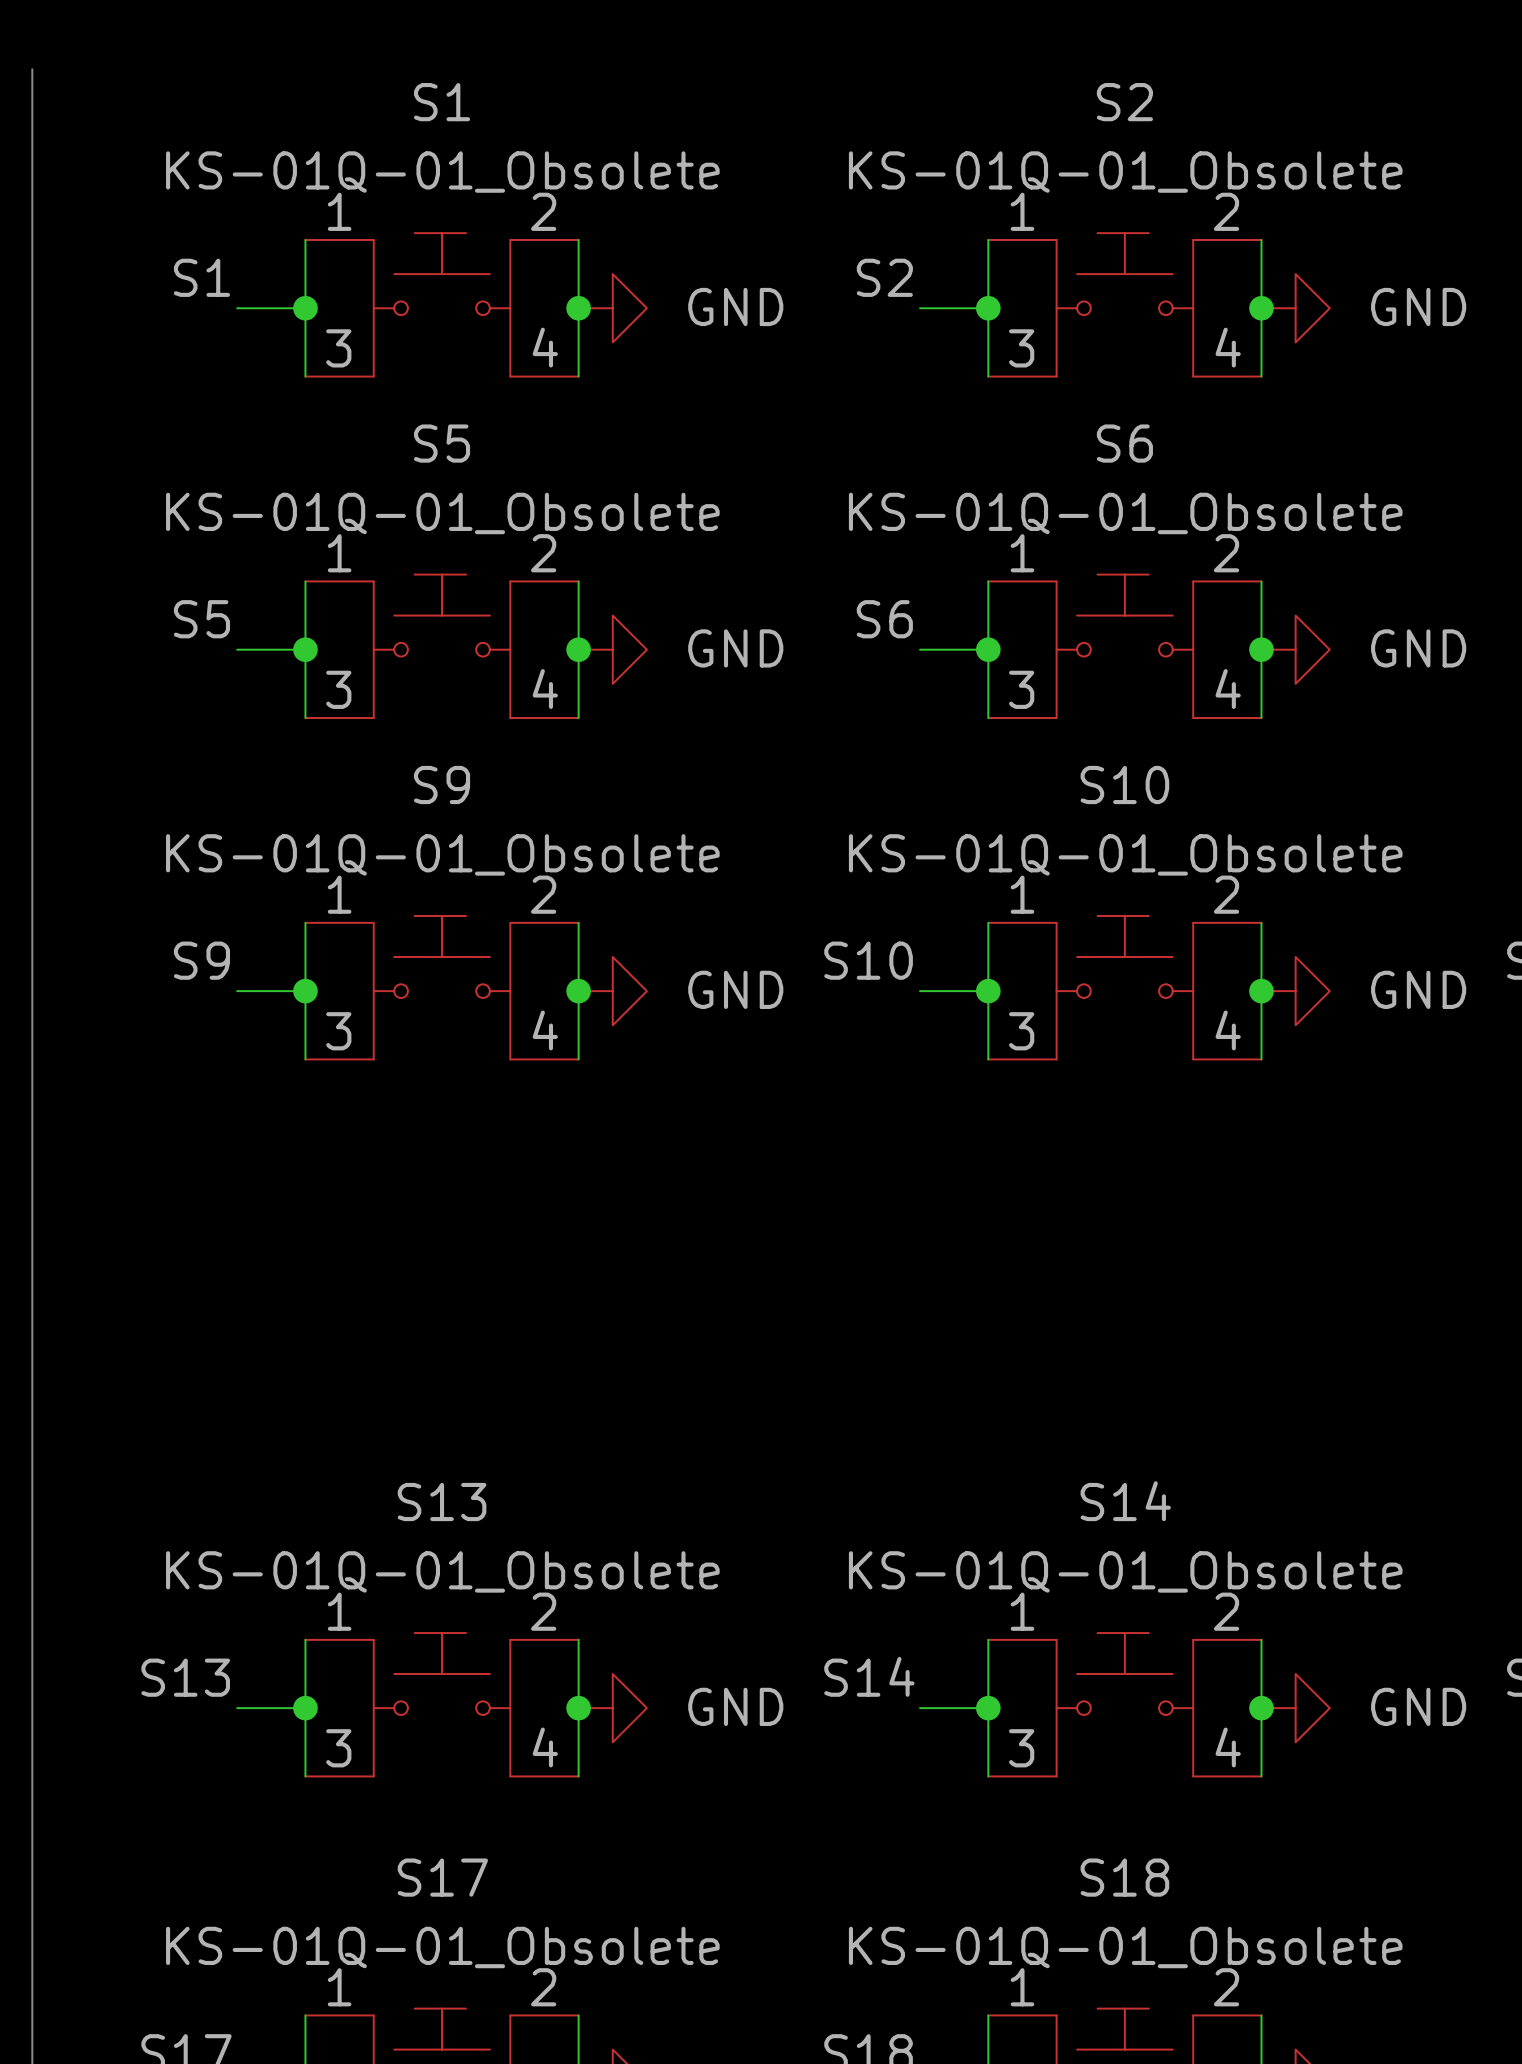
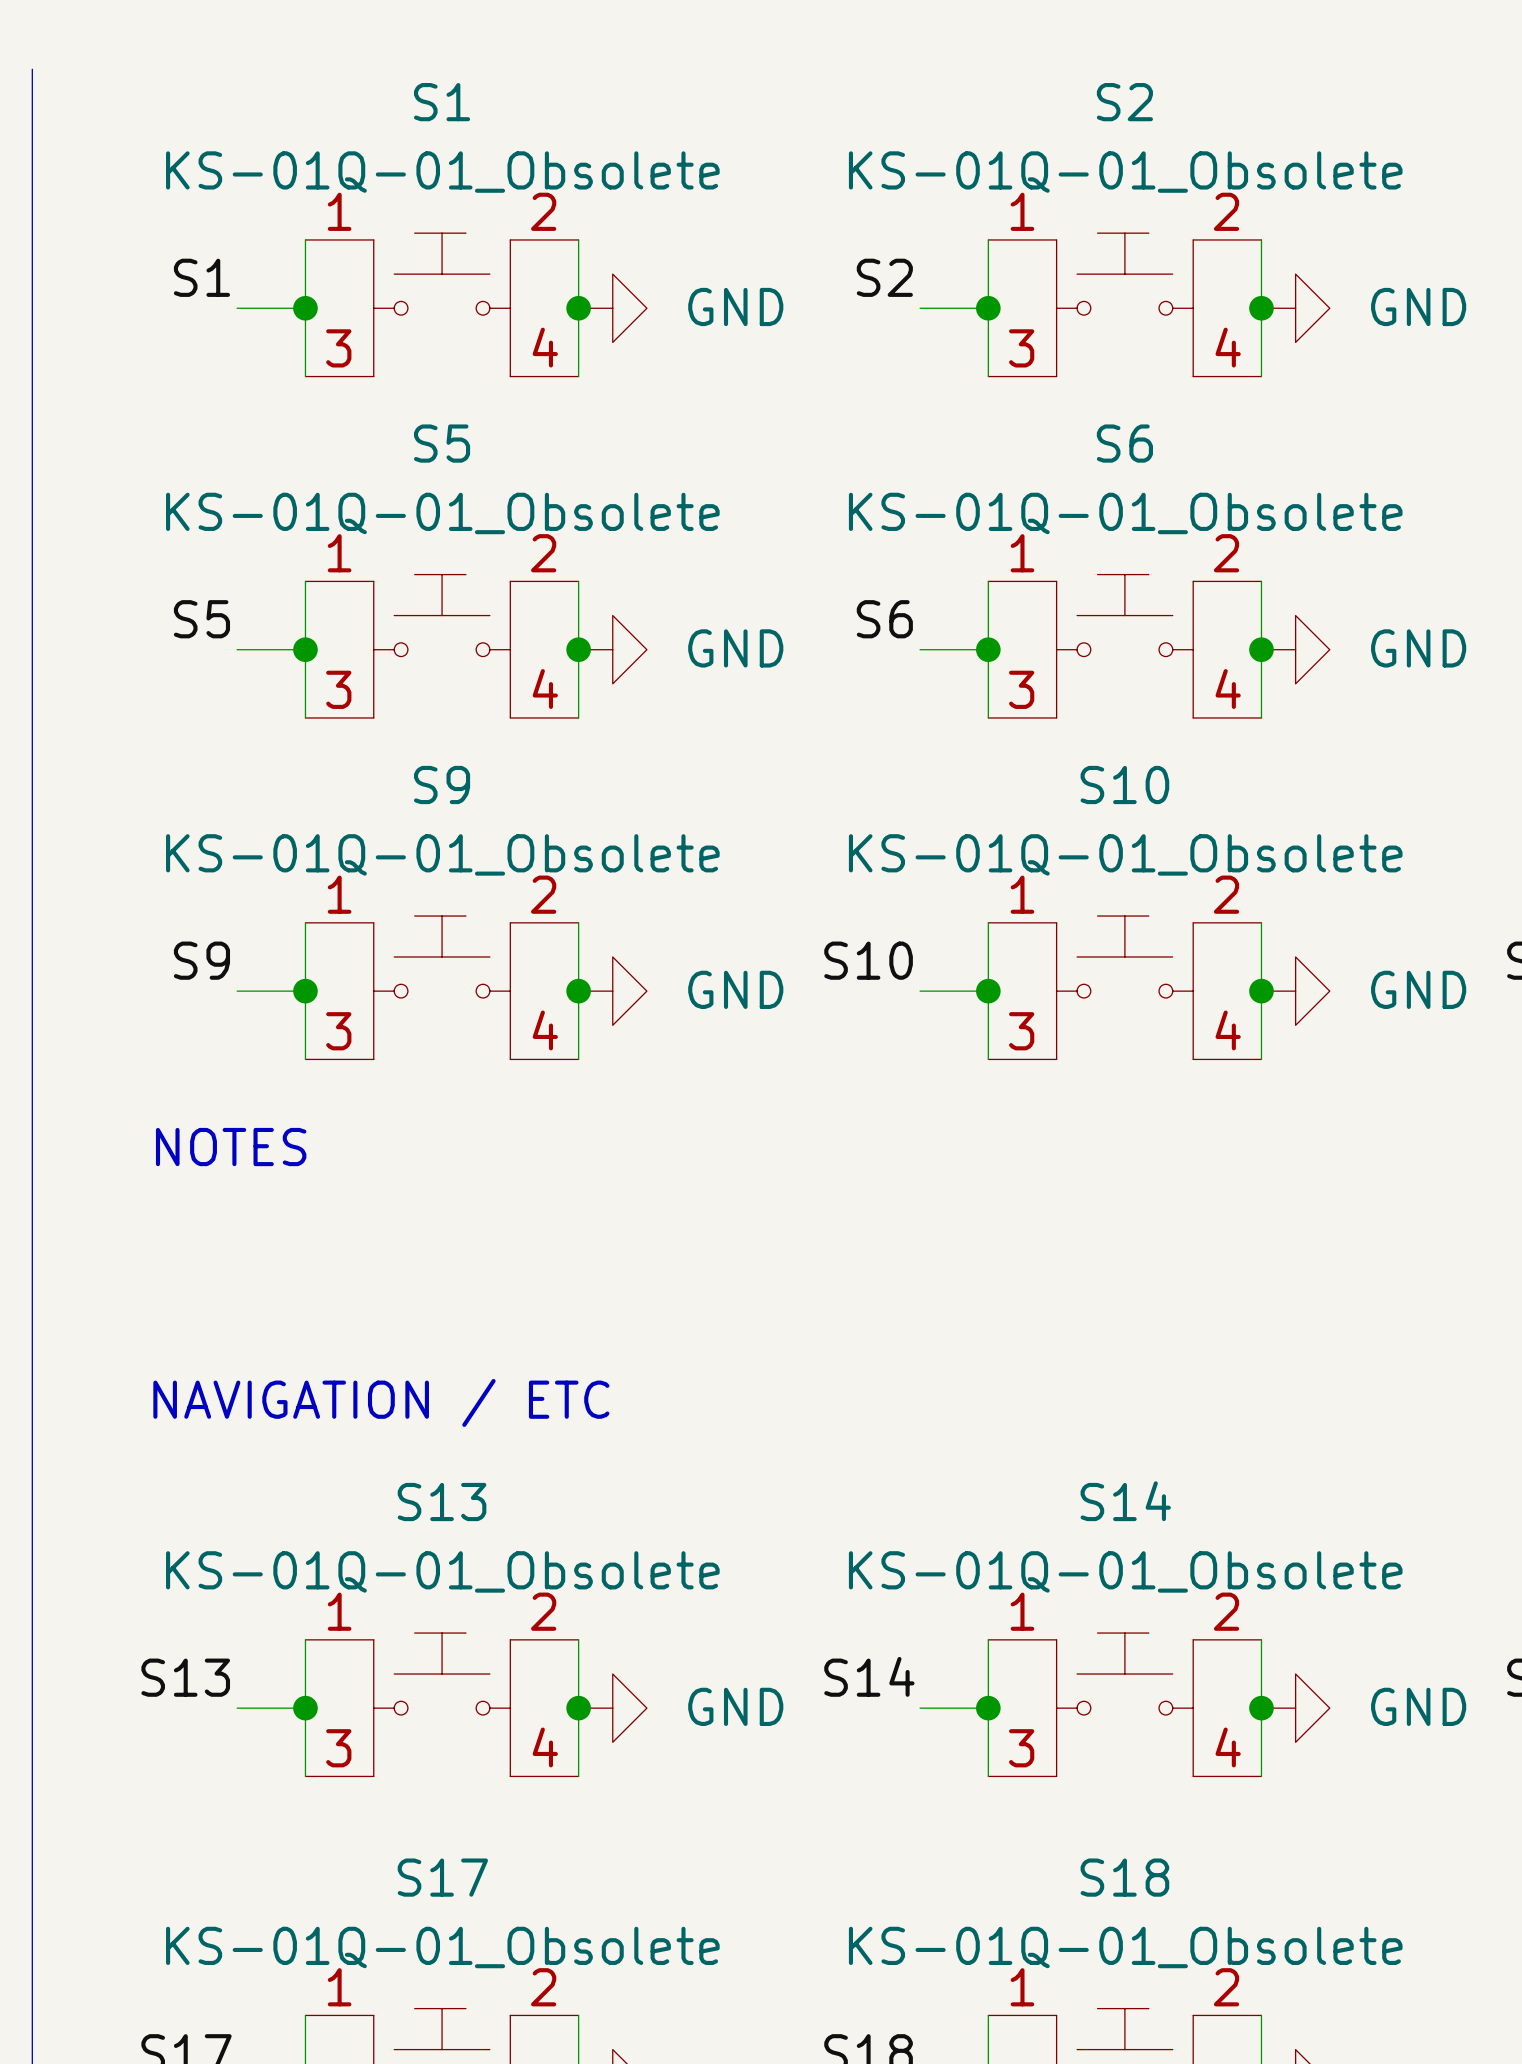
text: none -> NOTES (231, 1147)
text: none -> NAVIGATION / ETC (381, 1402)

